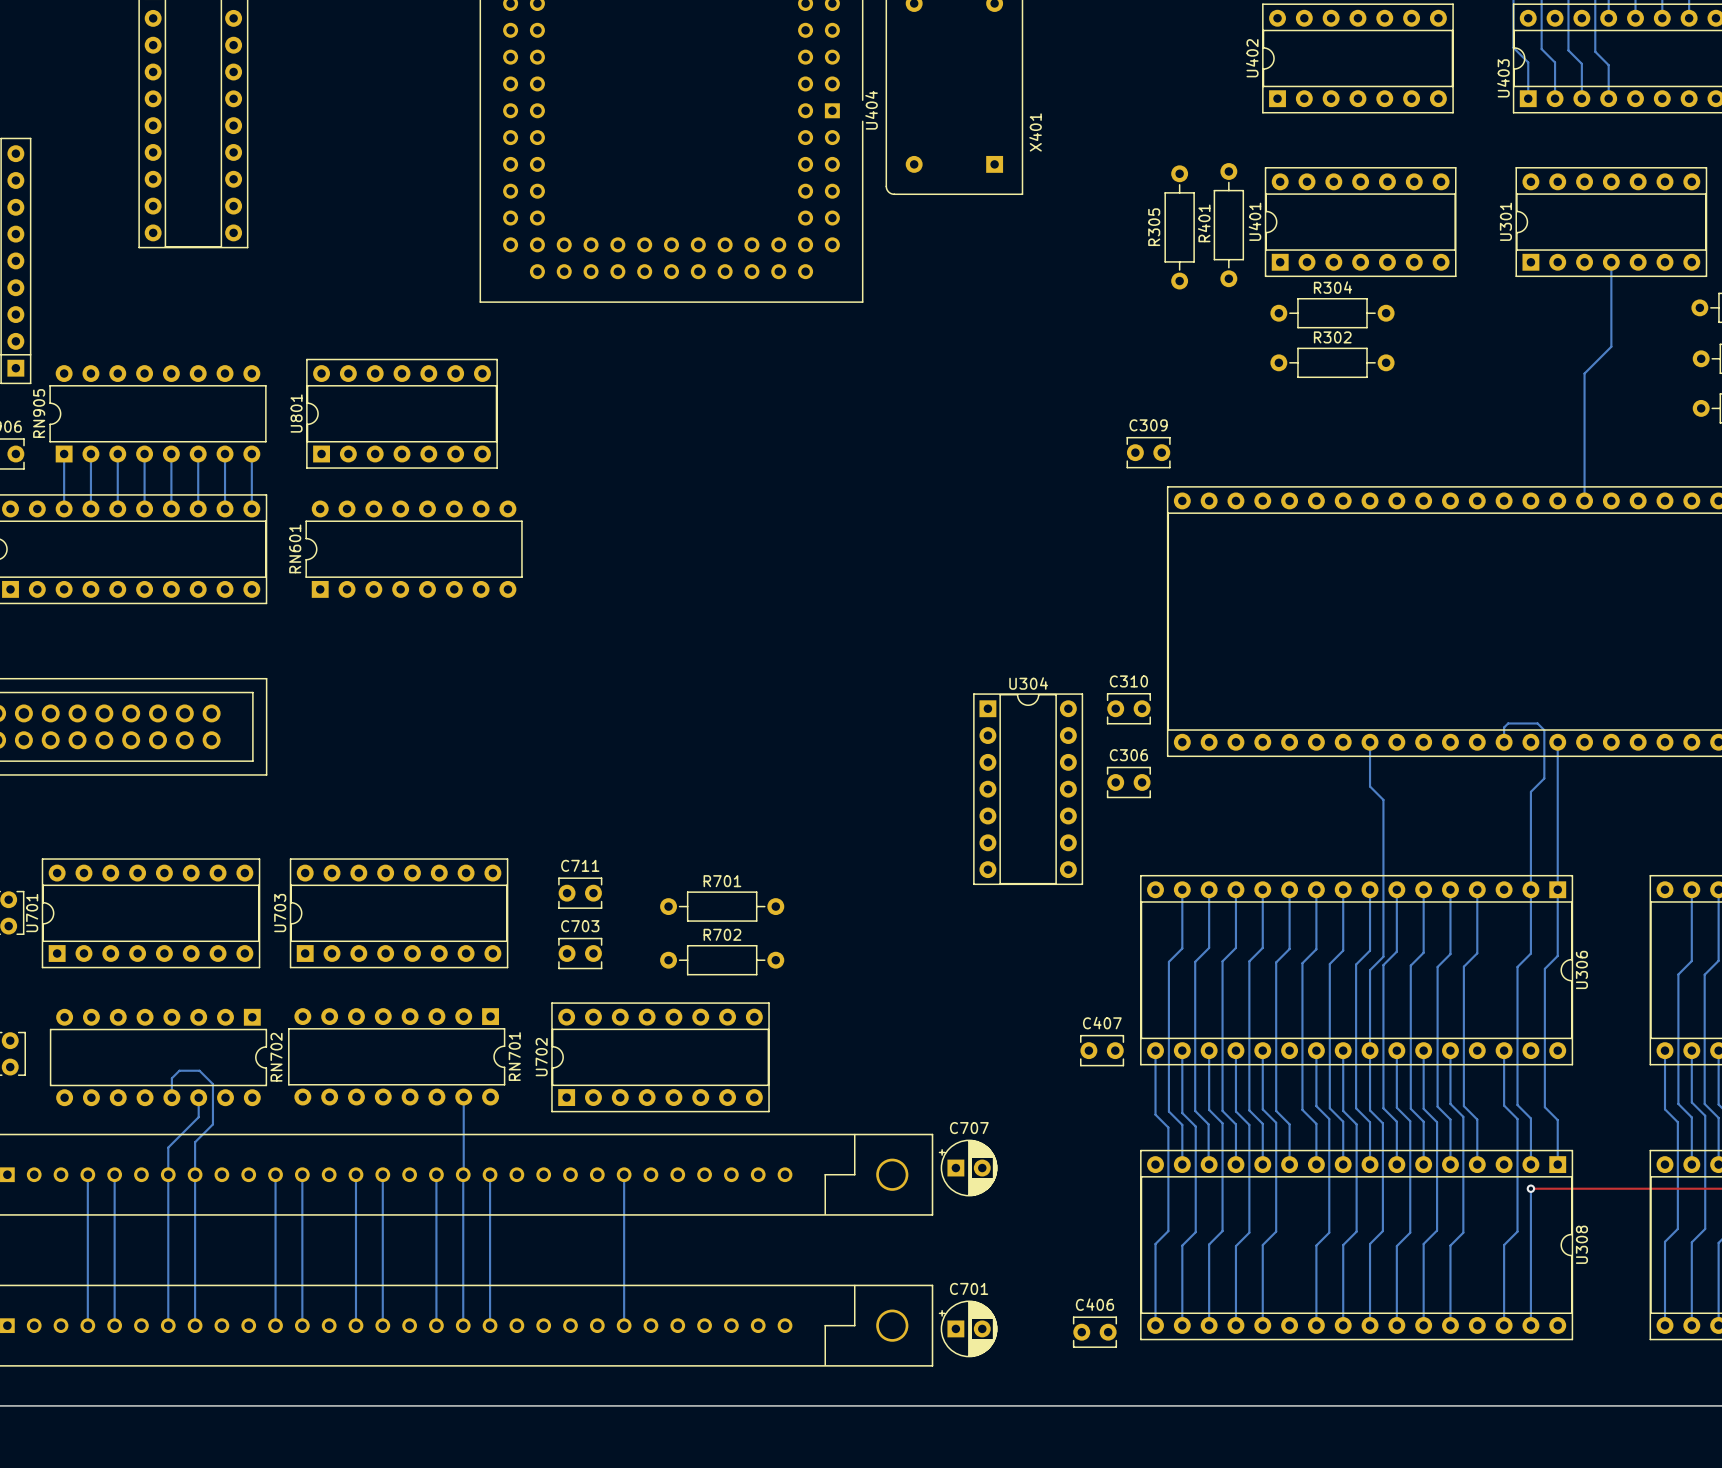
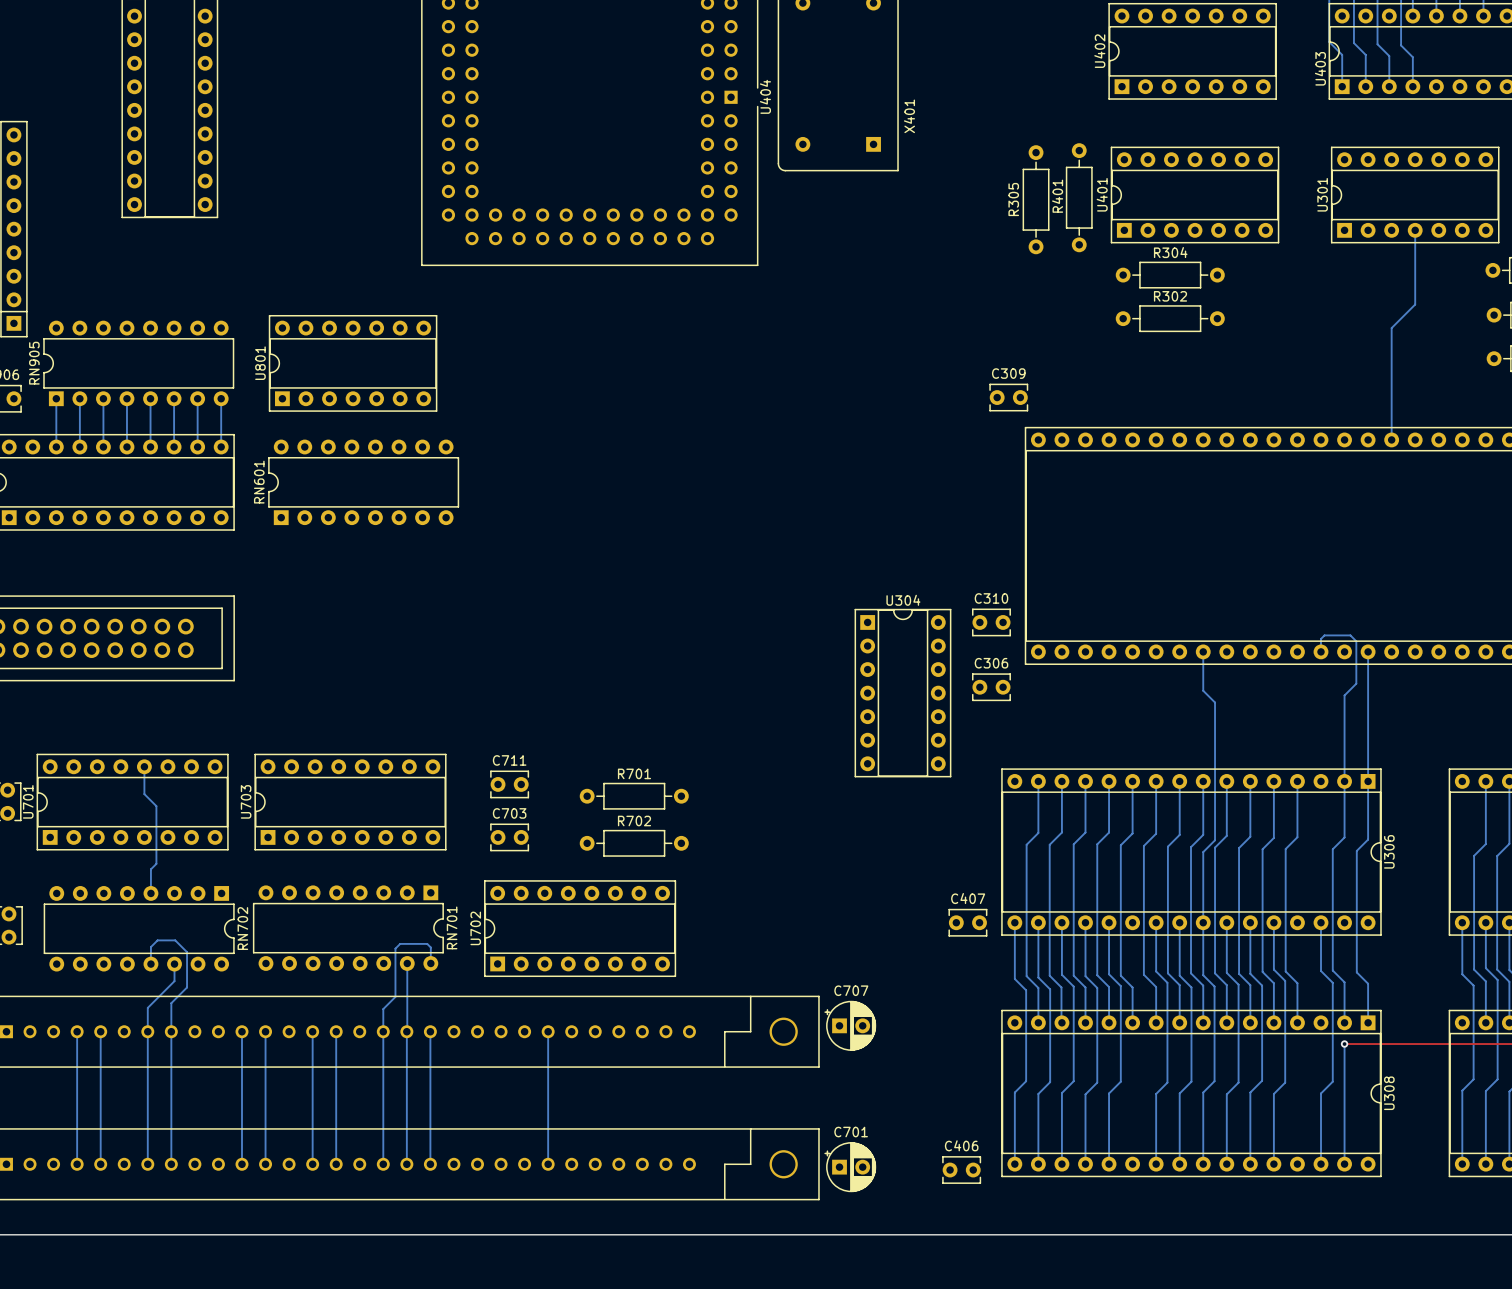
bottom track: none -> (144, 766) (144, 794) (156, 806) (156, 863) (150, 869) (150, 893)
bottom track: none -> (430, 963) (430, 947) (427, 943) (400, 943) (395, 948) (395, 996) (383, 1009) (383, 1031)

